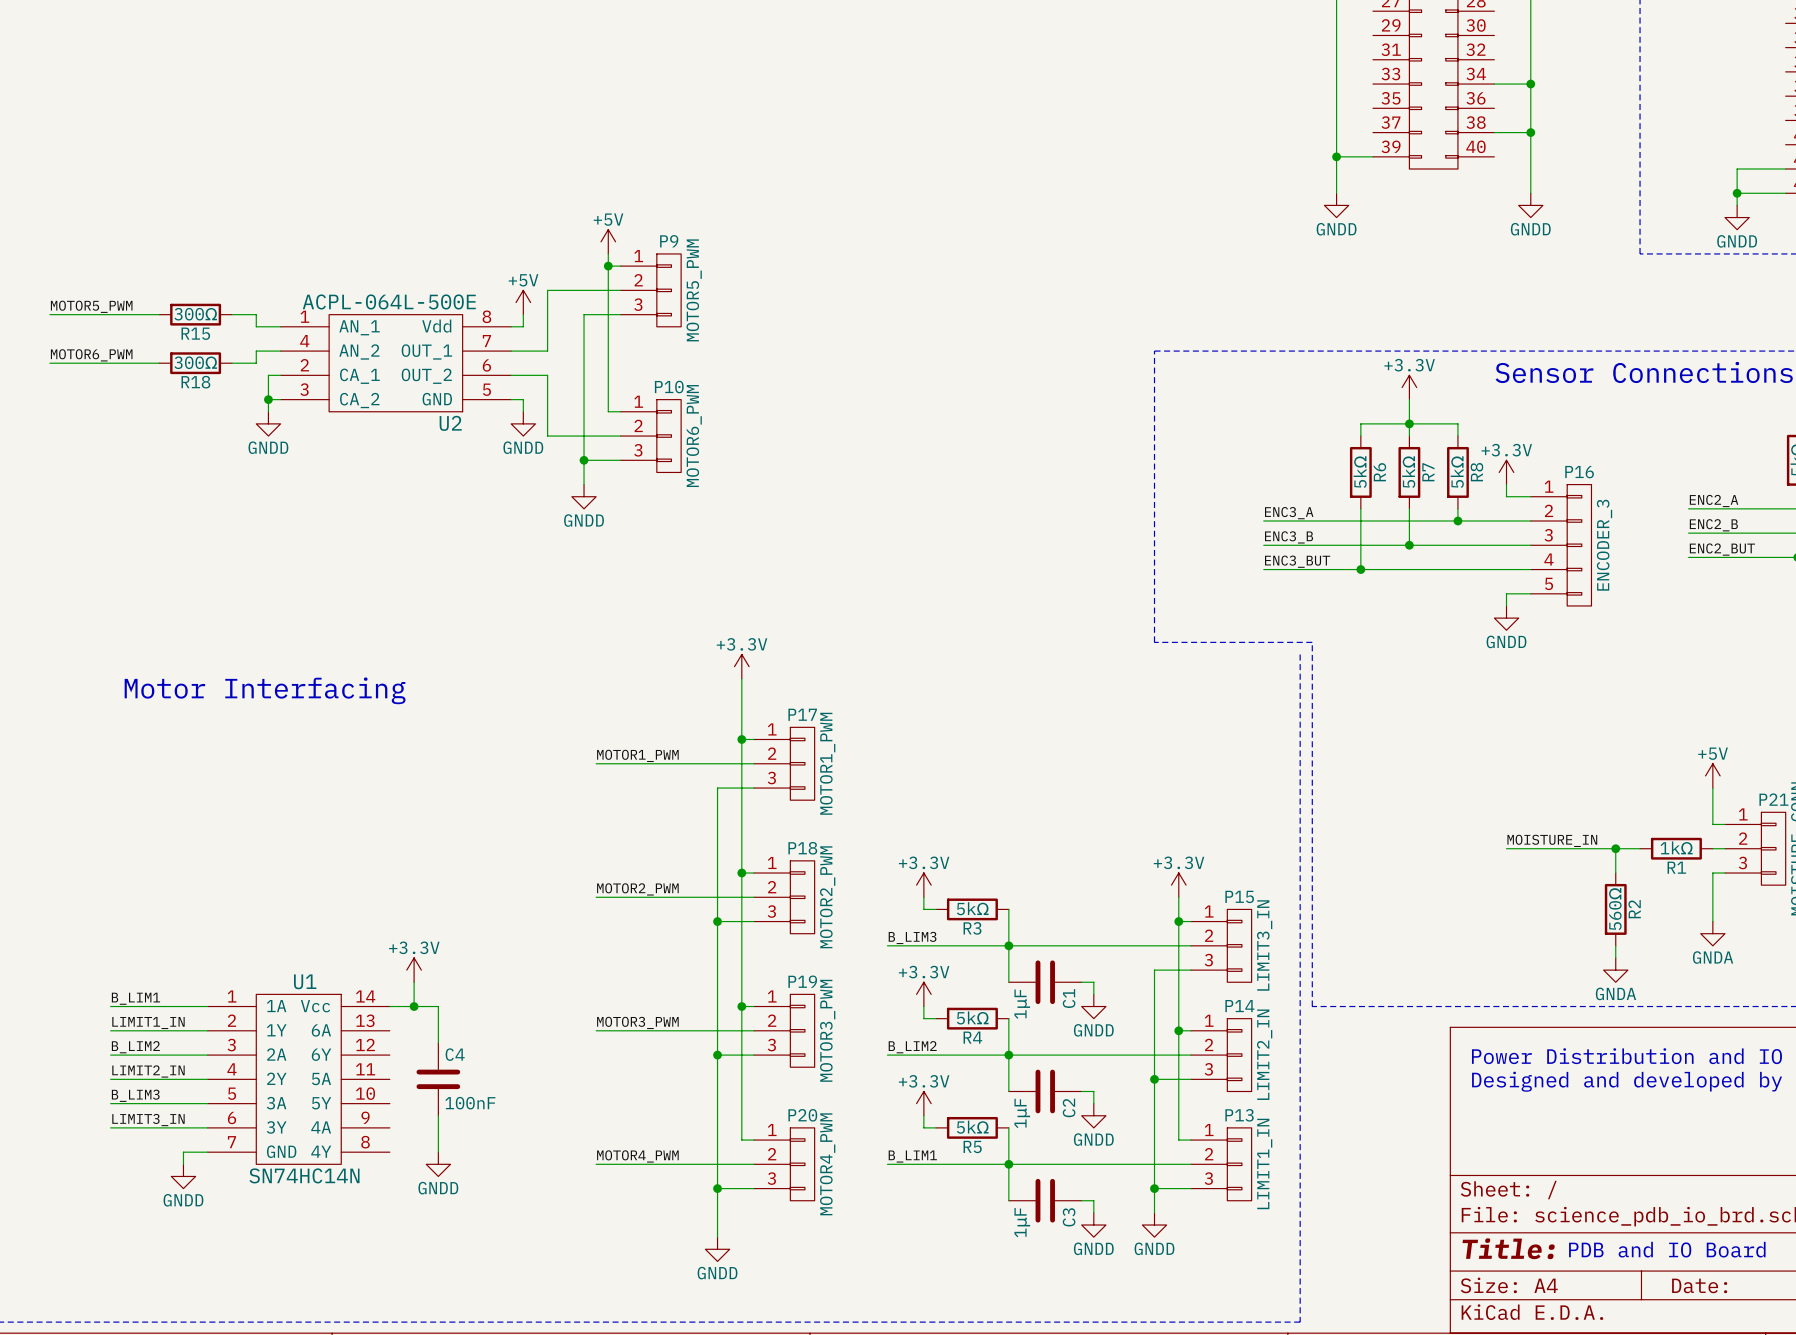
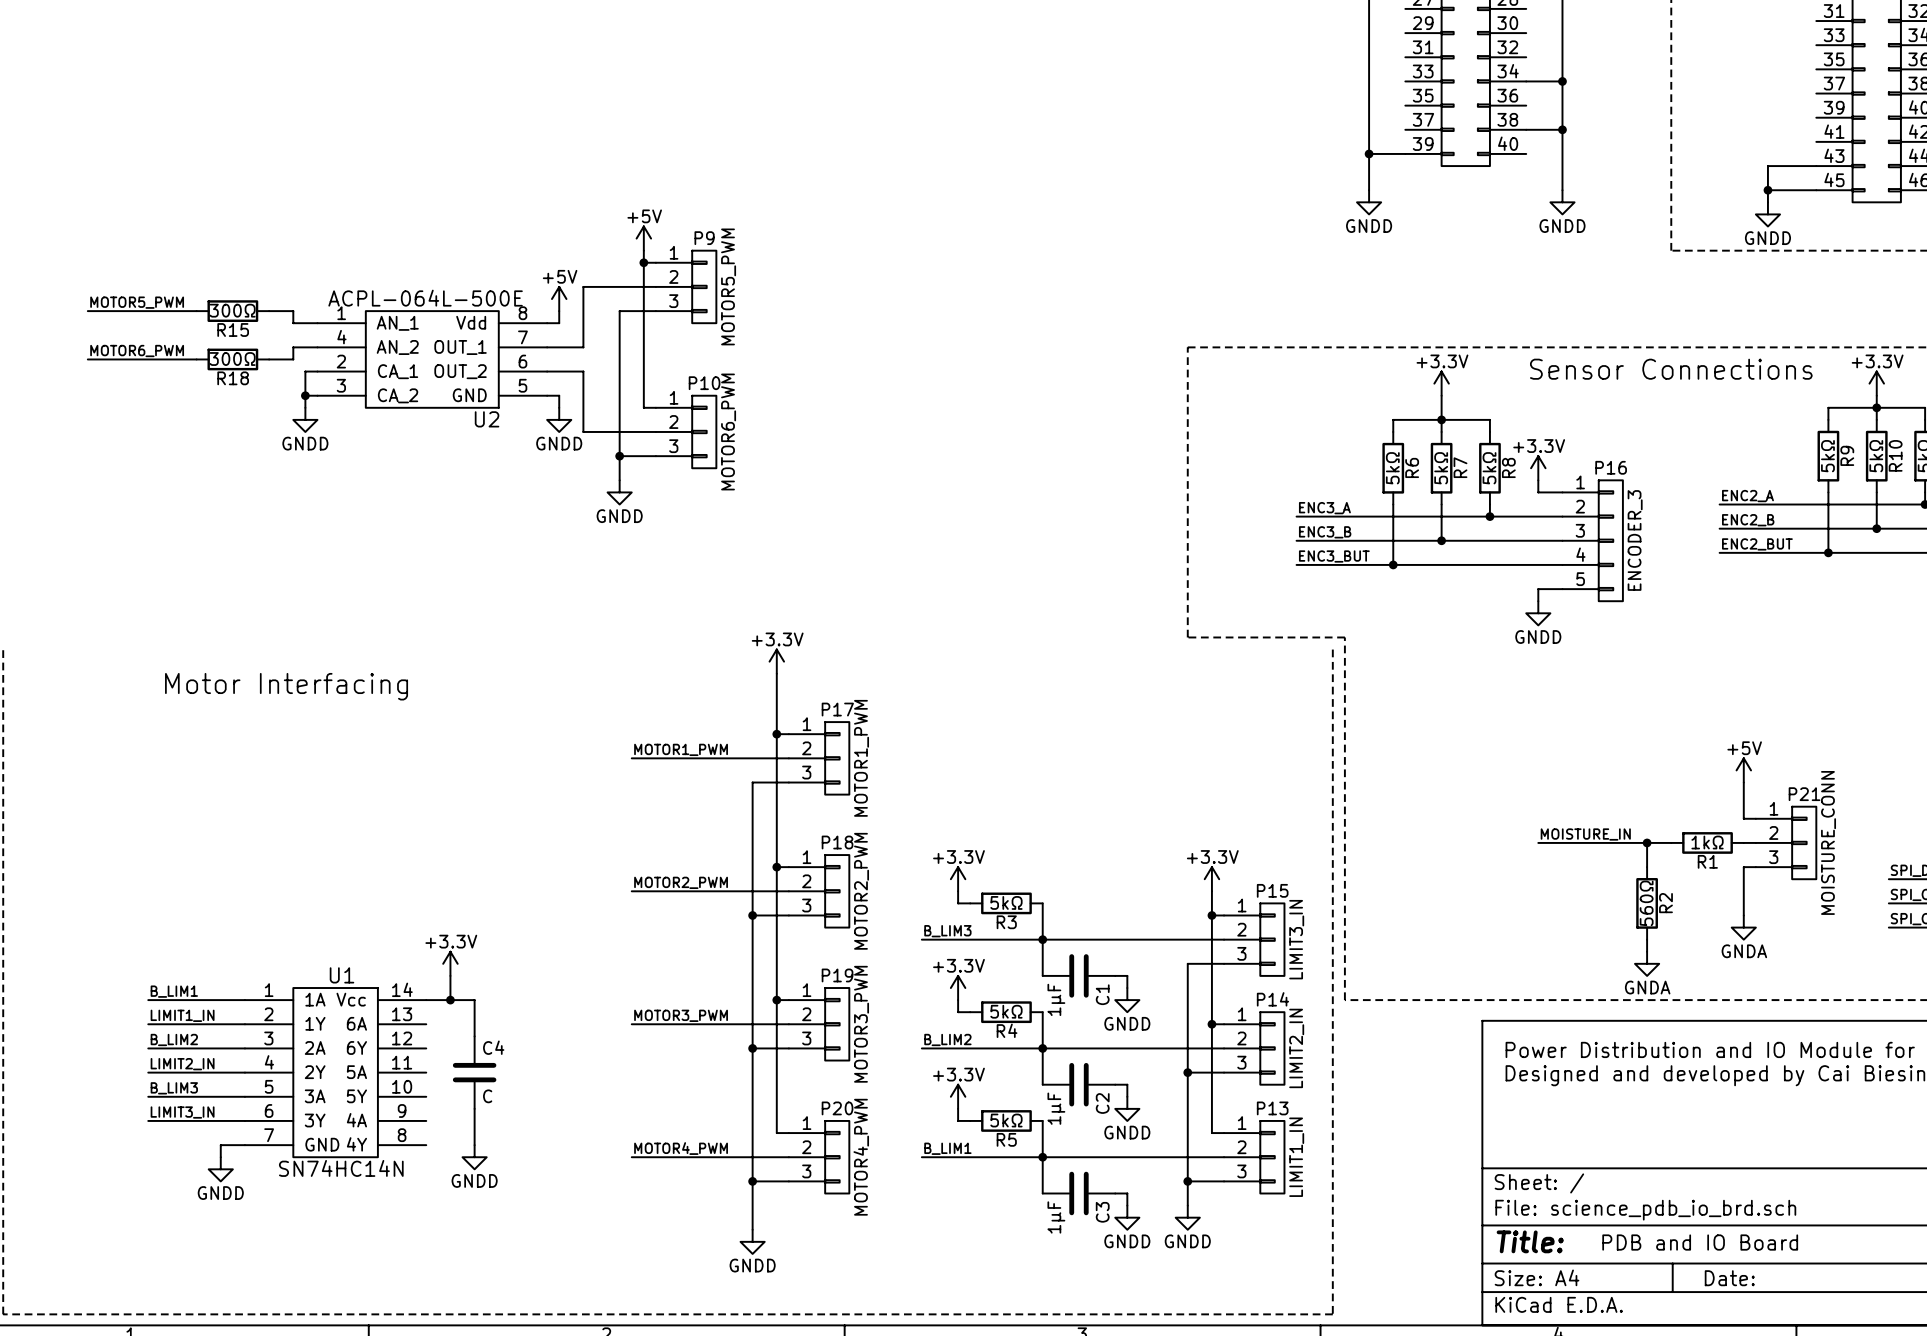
C4 value: 100nF (470, 1103) -> C (487, 1096)

